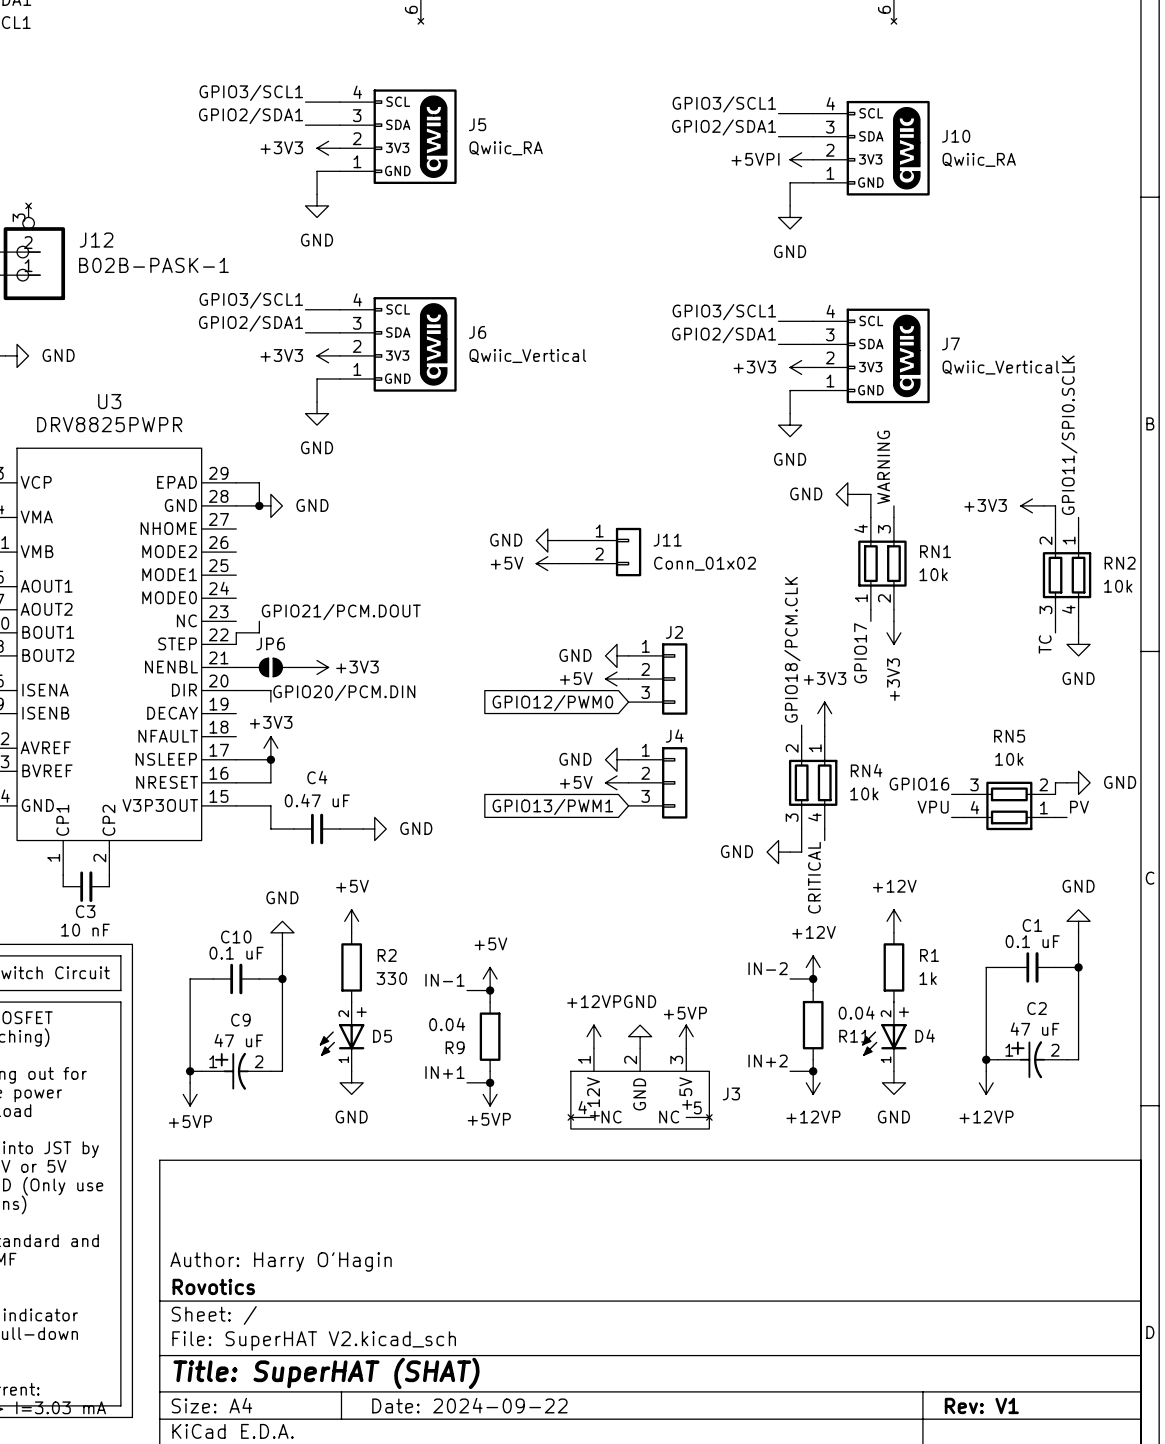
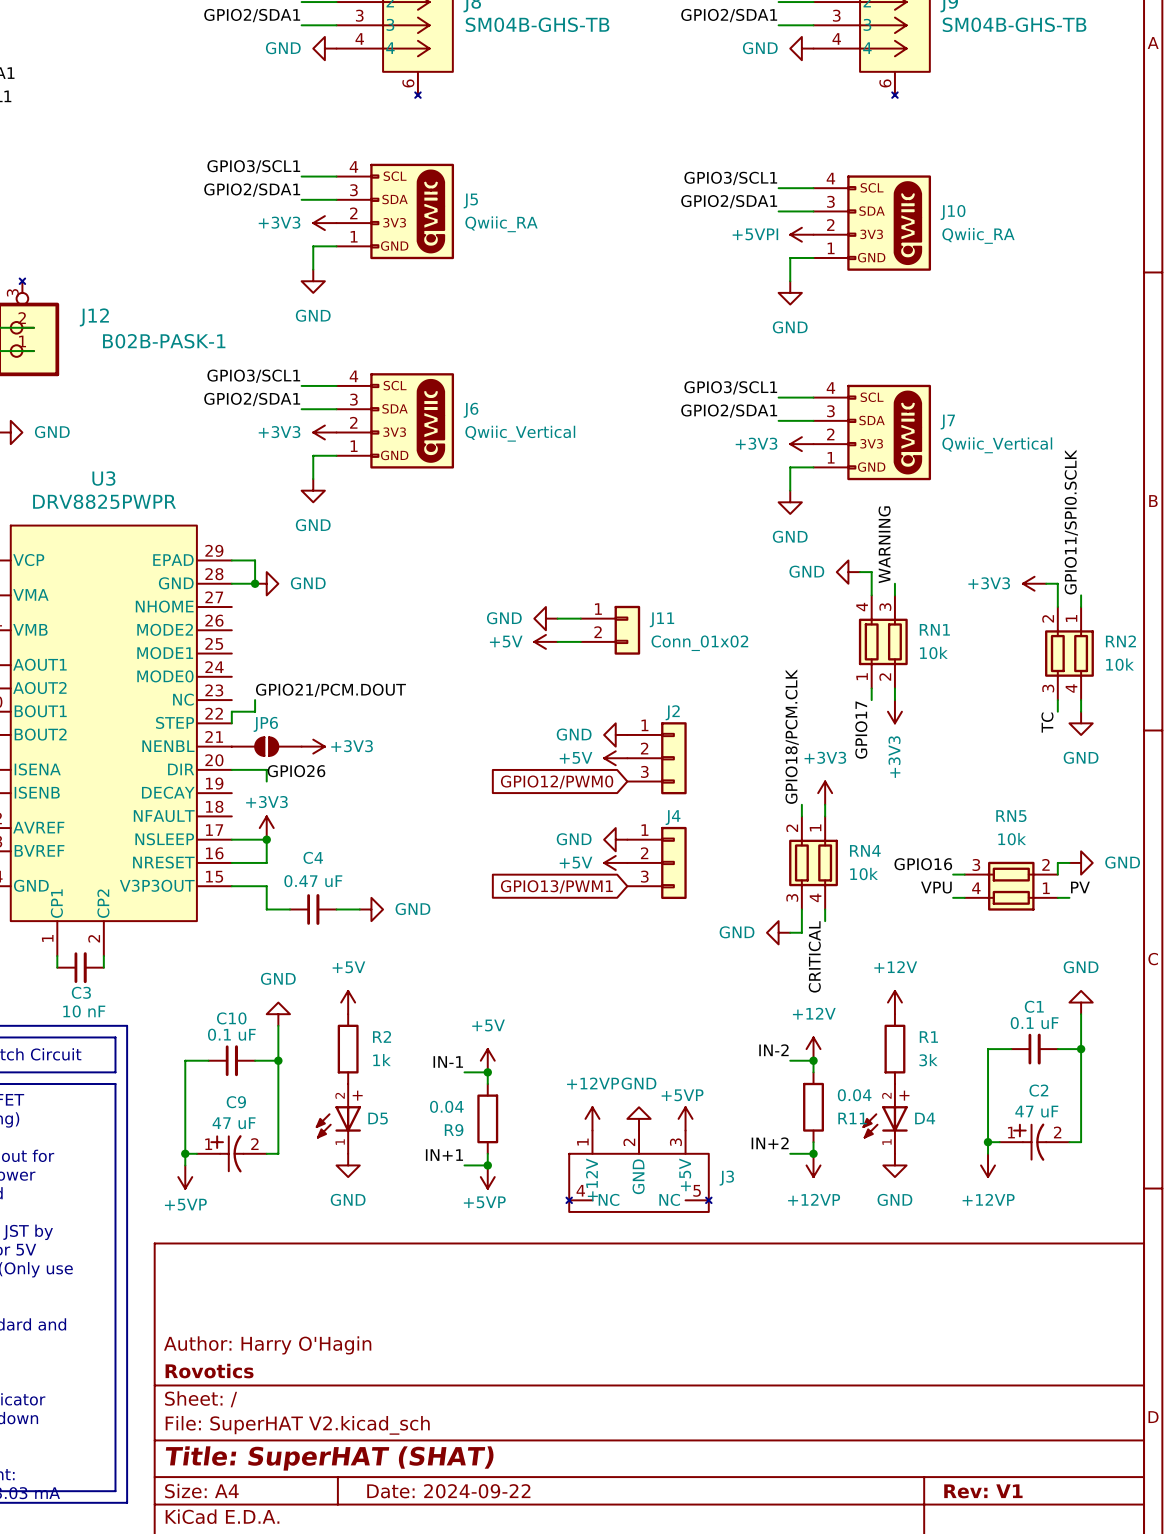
label: GPIO20/PCM.DIN (344, 692) -> GPIO26 (296, 771)
R2 value: 330 (391, 978) -> 1k (381, 1060)
R1 value: 1k (928, 978) -> 3k (928, 1060)

